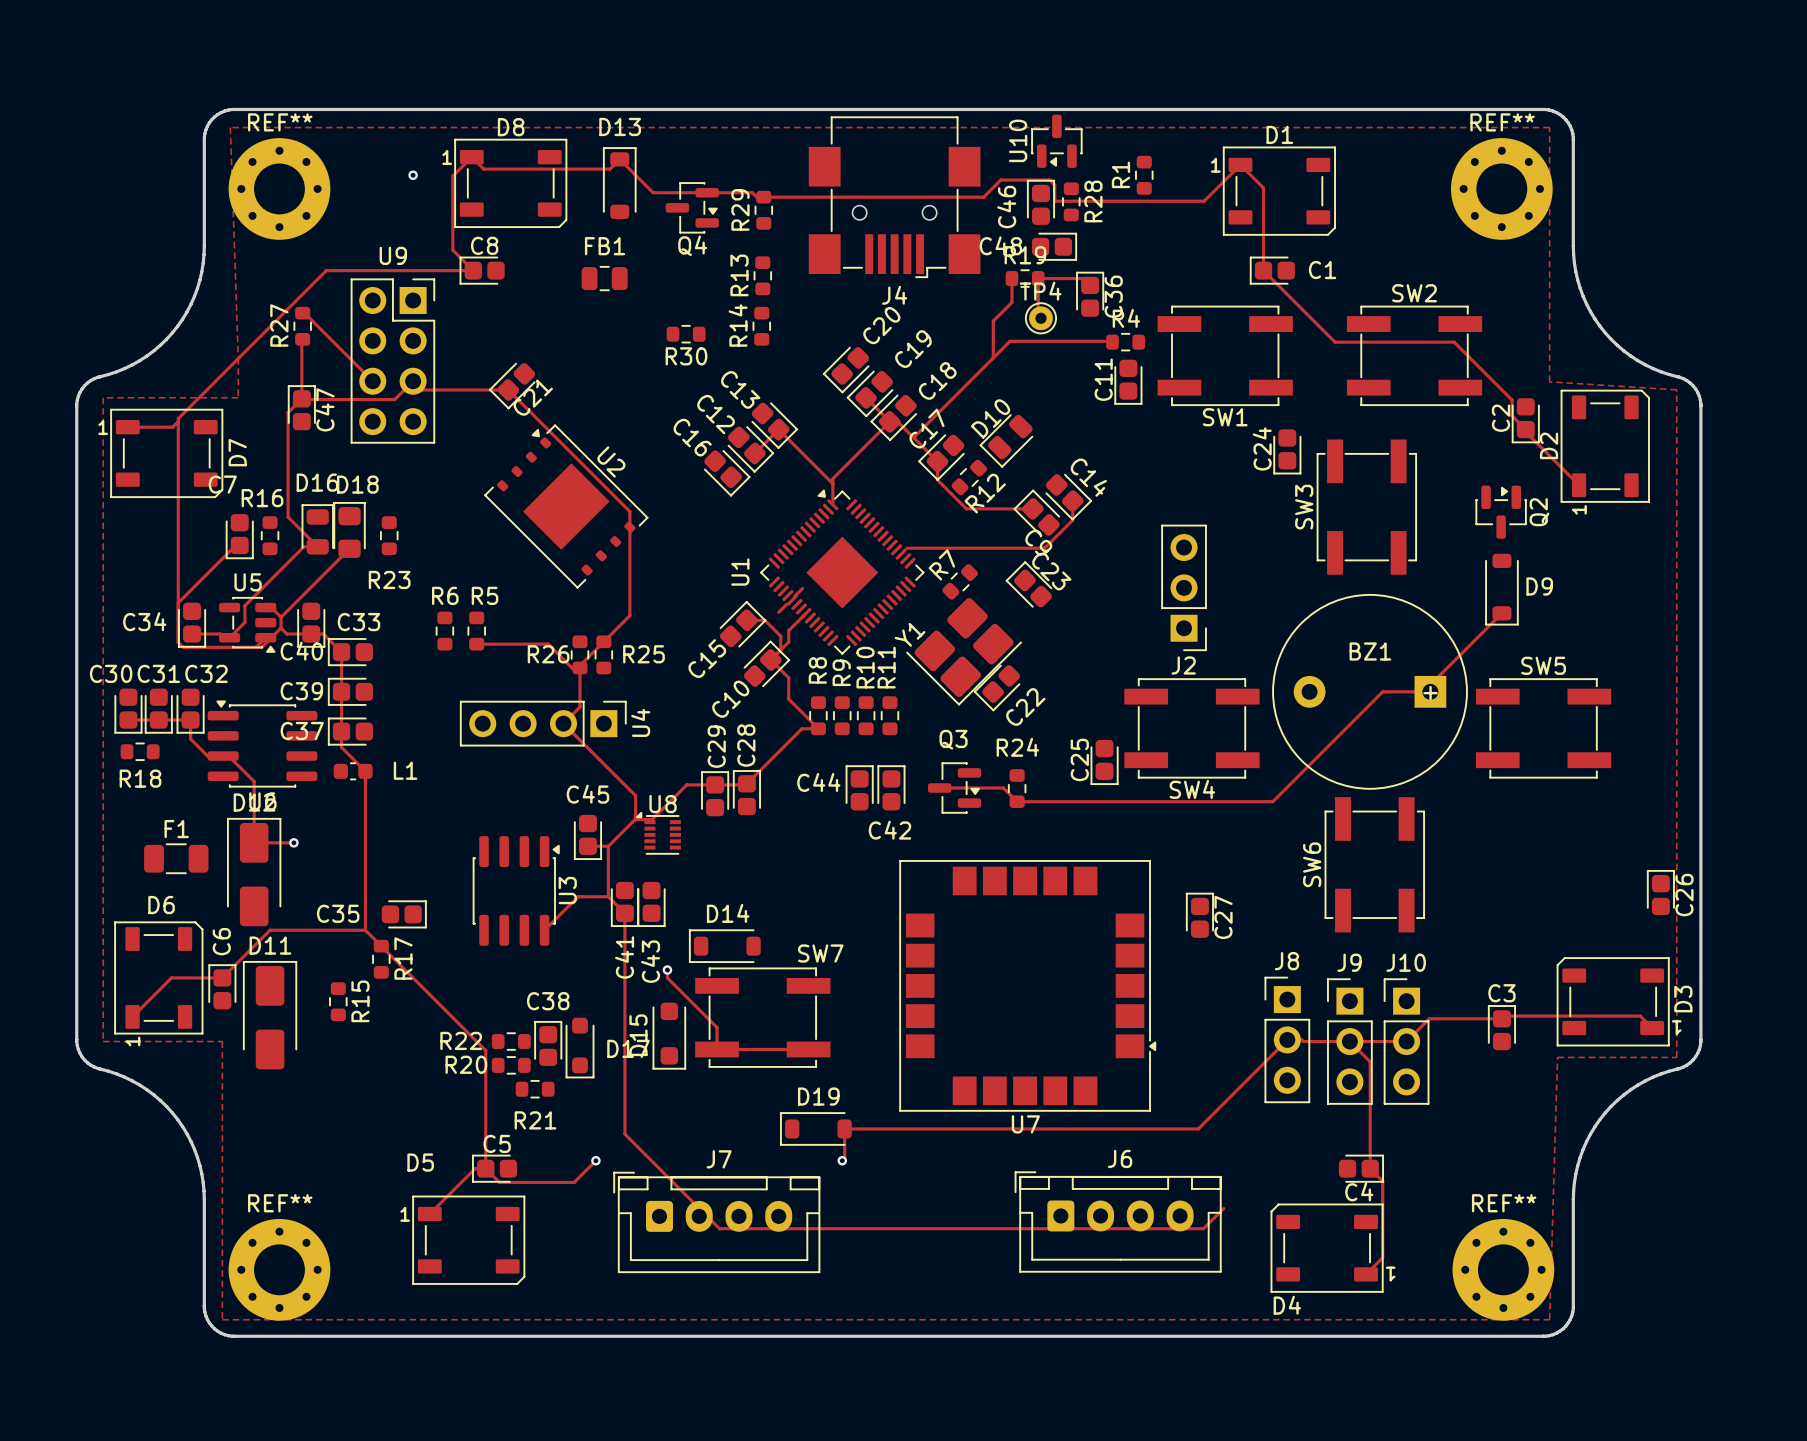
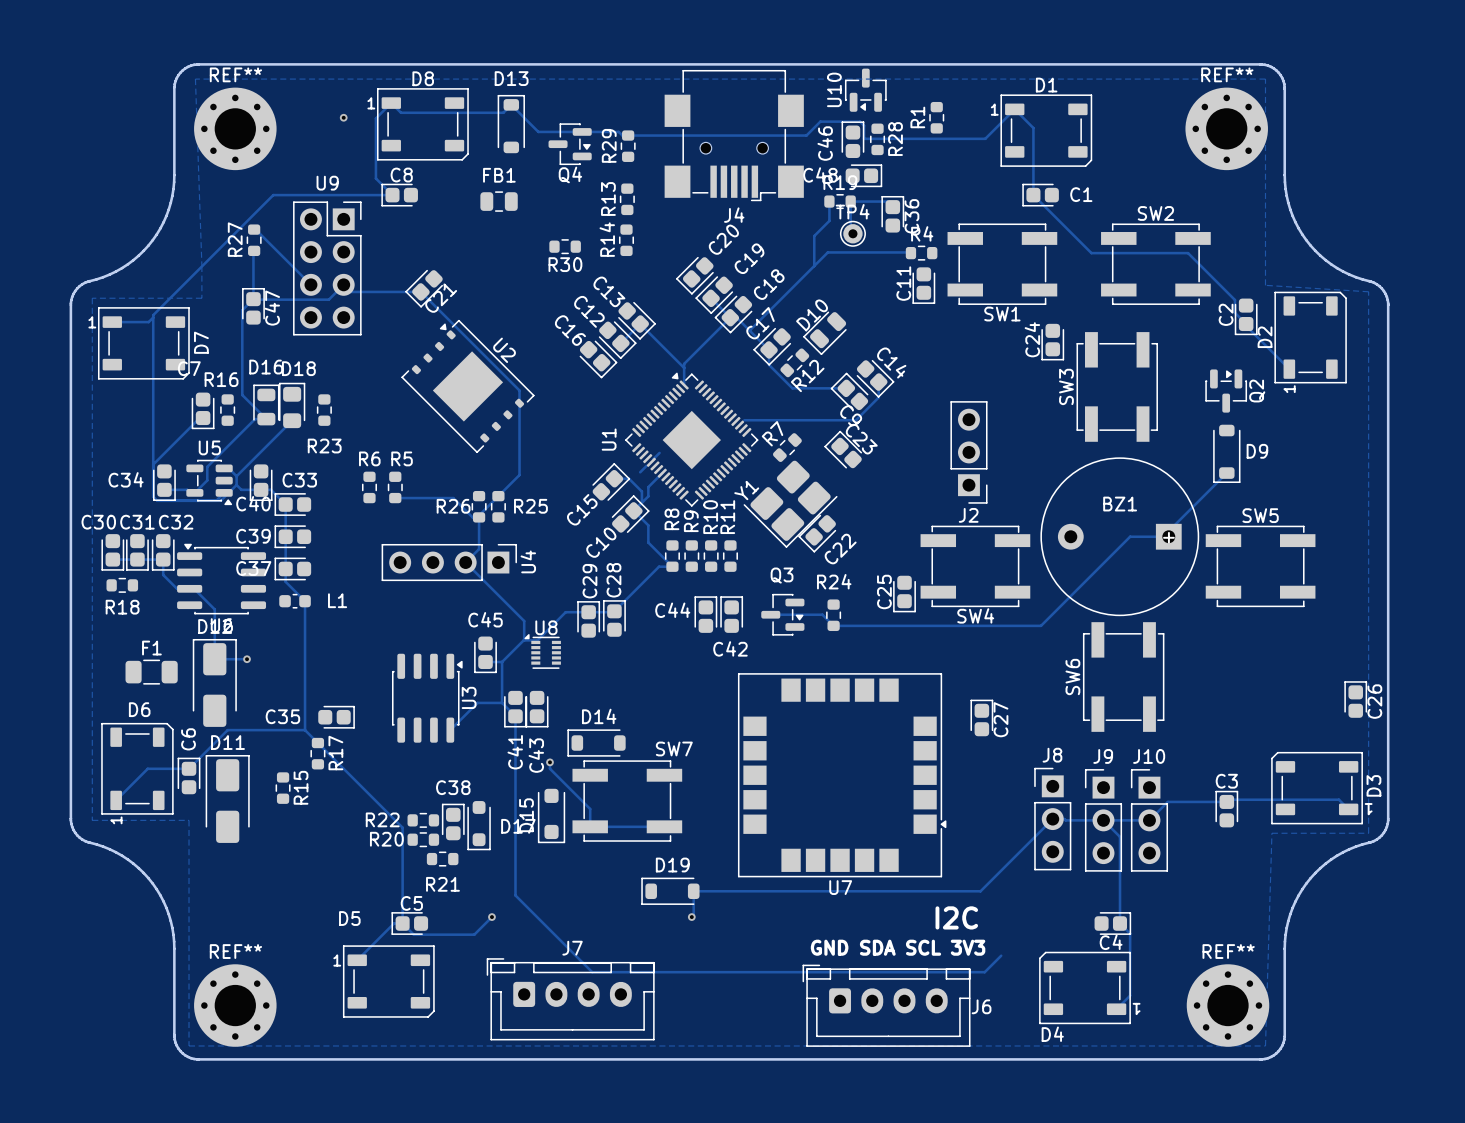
J6 name position: J6 (1120, 1158) -> J6 (981, 1006)
text: none -> I2C (956, 917)
text: none -> GND SDA SCL 3V3 (898, 947)
J7 position: (716, 1222) -> (570, 999)
J6 position: (1118, 1222) -> (886, 1005)

